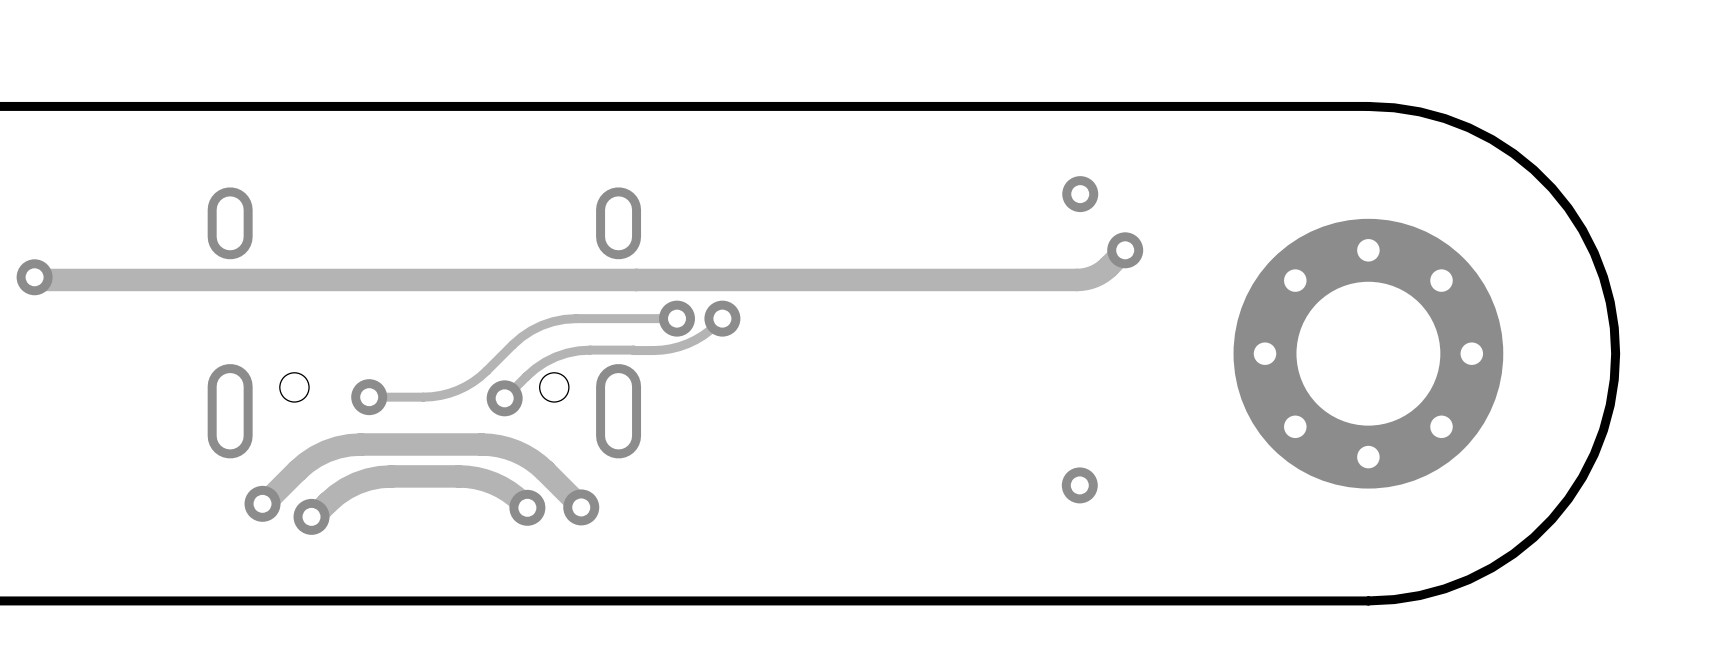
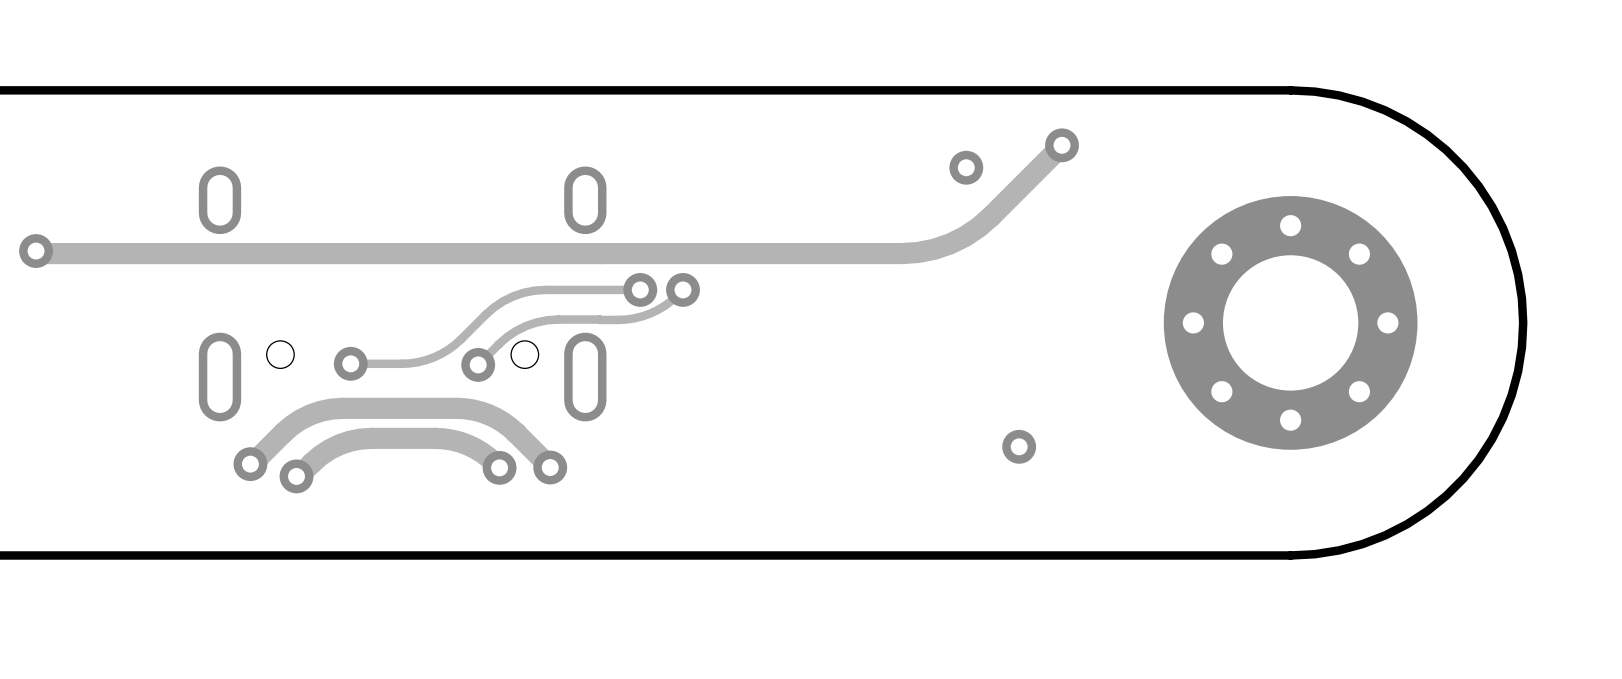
via: none -> (1062, 145)
via: none -> (966, 167)
via: (1080, 194) -> none
track: (1125, 250) (1101, 272) (1085, 279) (954, 279) -> (1062, 145) (978, 227) (950, 243) (918, 252) (901, 253)
via: (1125, 250) -> none

